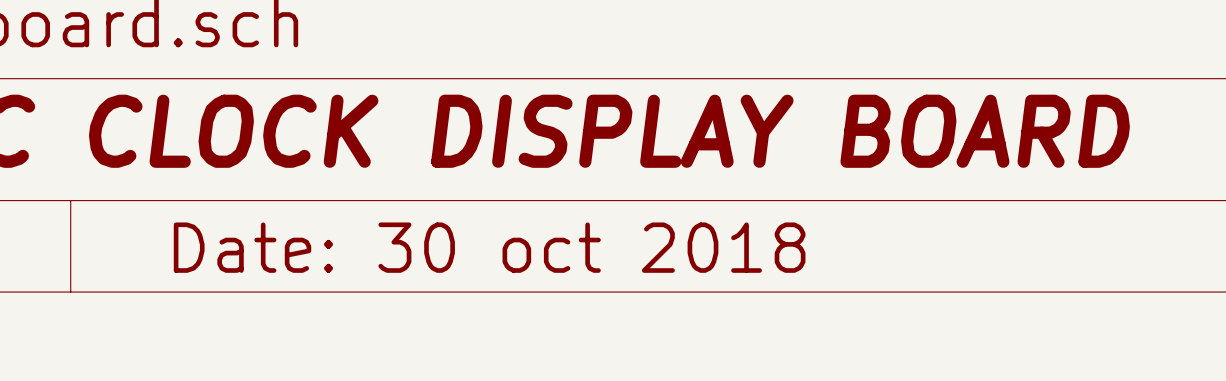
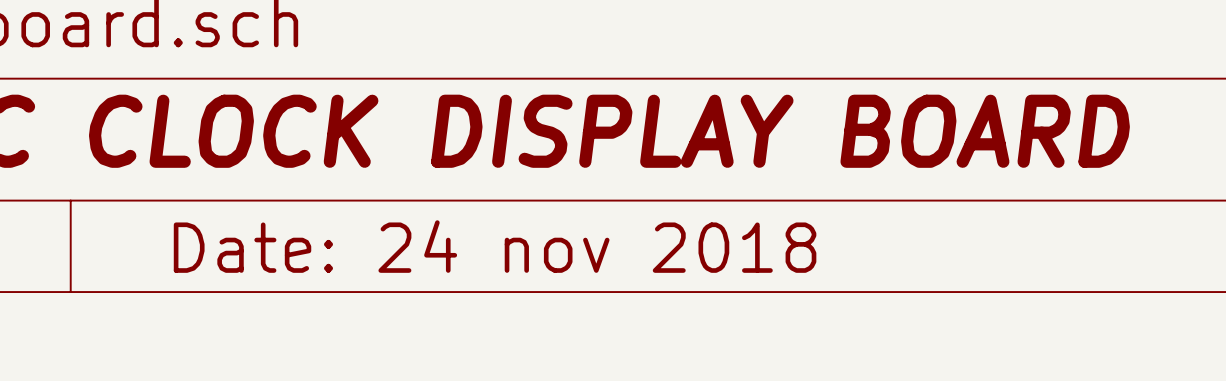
title block: Date: 30 oct 2018 (489, 247) -> Date: 24 nov 2018 (495, 246)

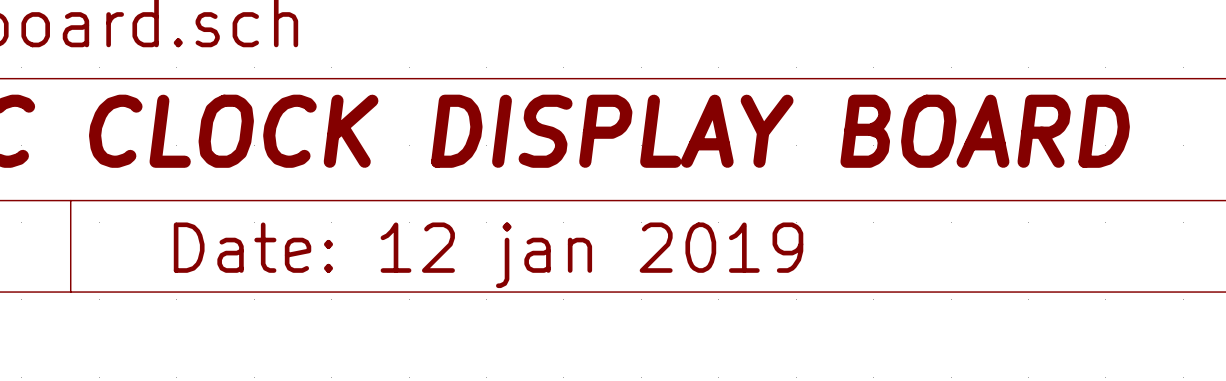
title block: Date: 24 nov 2018 (495, 246) -> Date: 12 jan 2019 (488, 255)

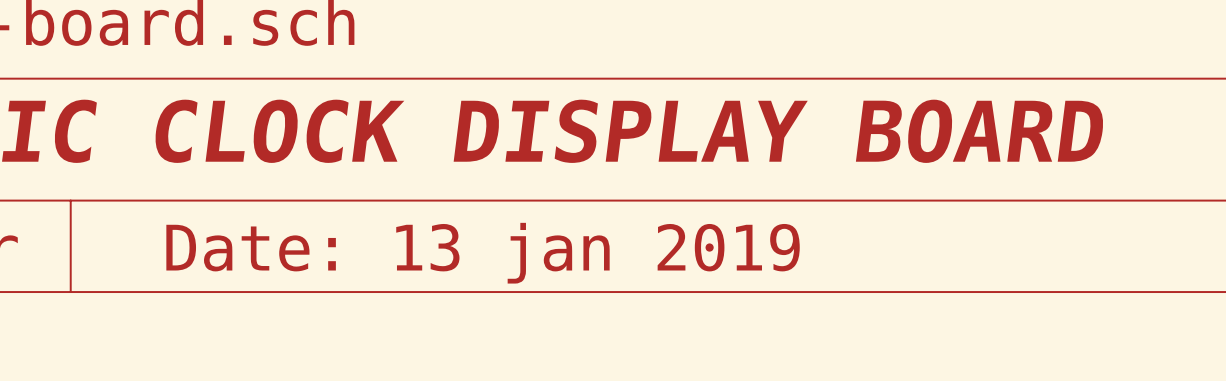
title block: Date: 12 jan 2019 (488, 255) -> Date: 13 jan 2019 (483, 253)

